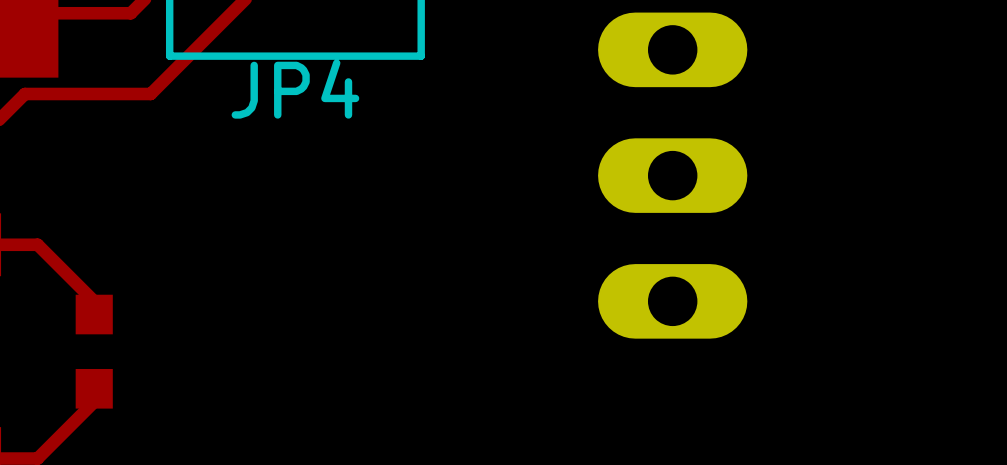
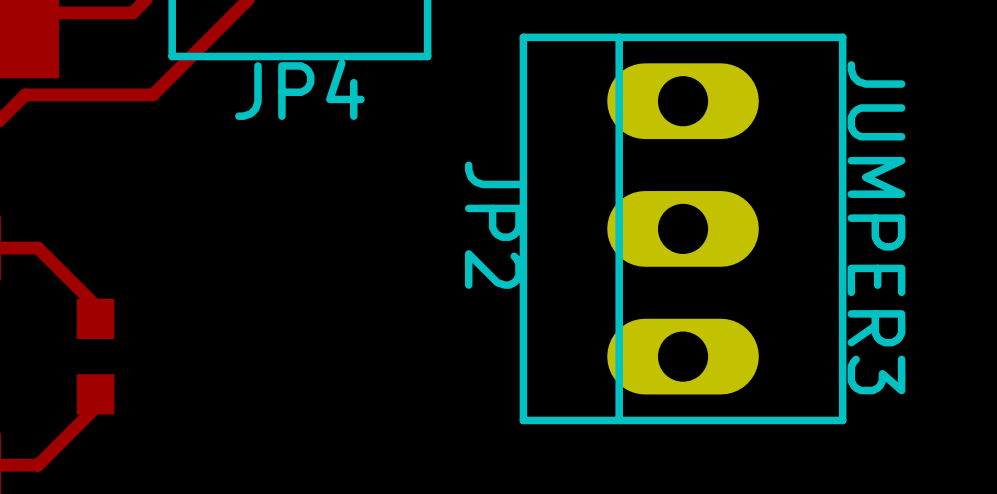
JP2 side: top (672, 175) -> bottom (683, 228)

